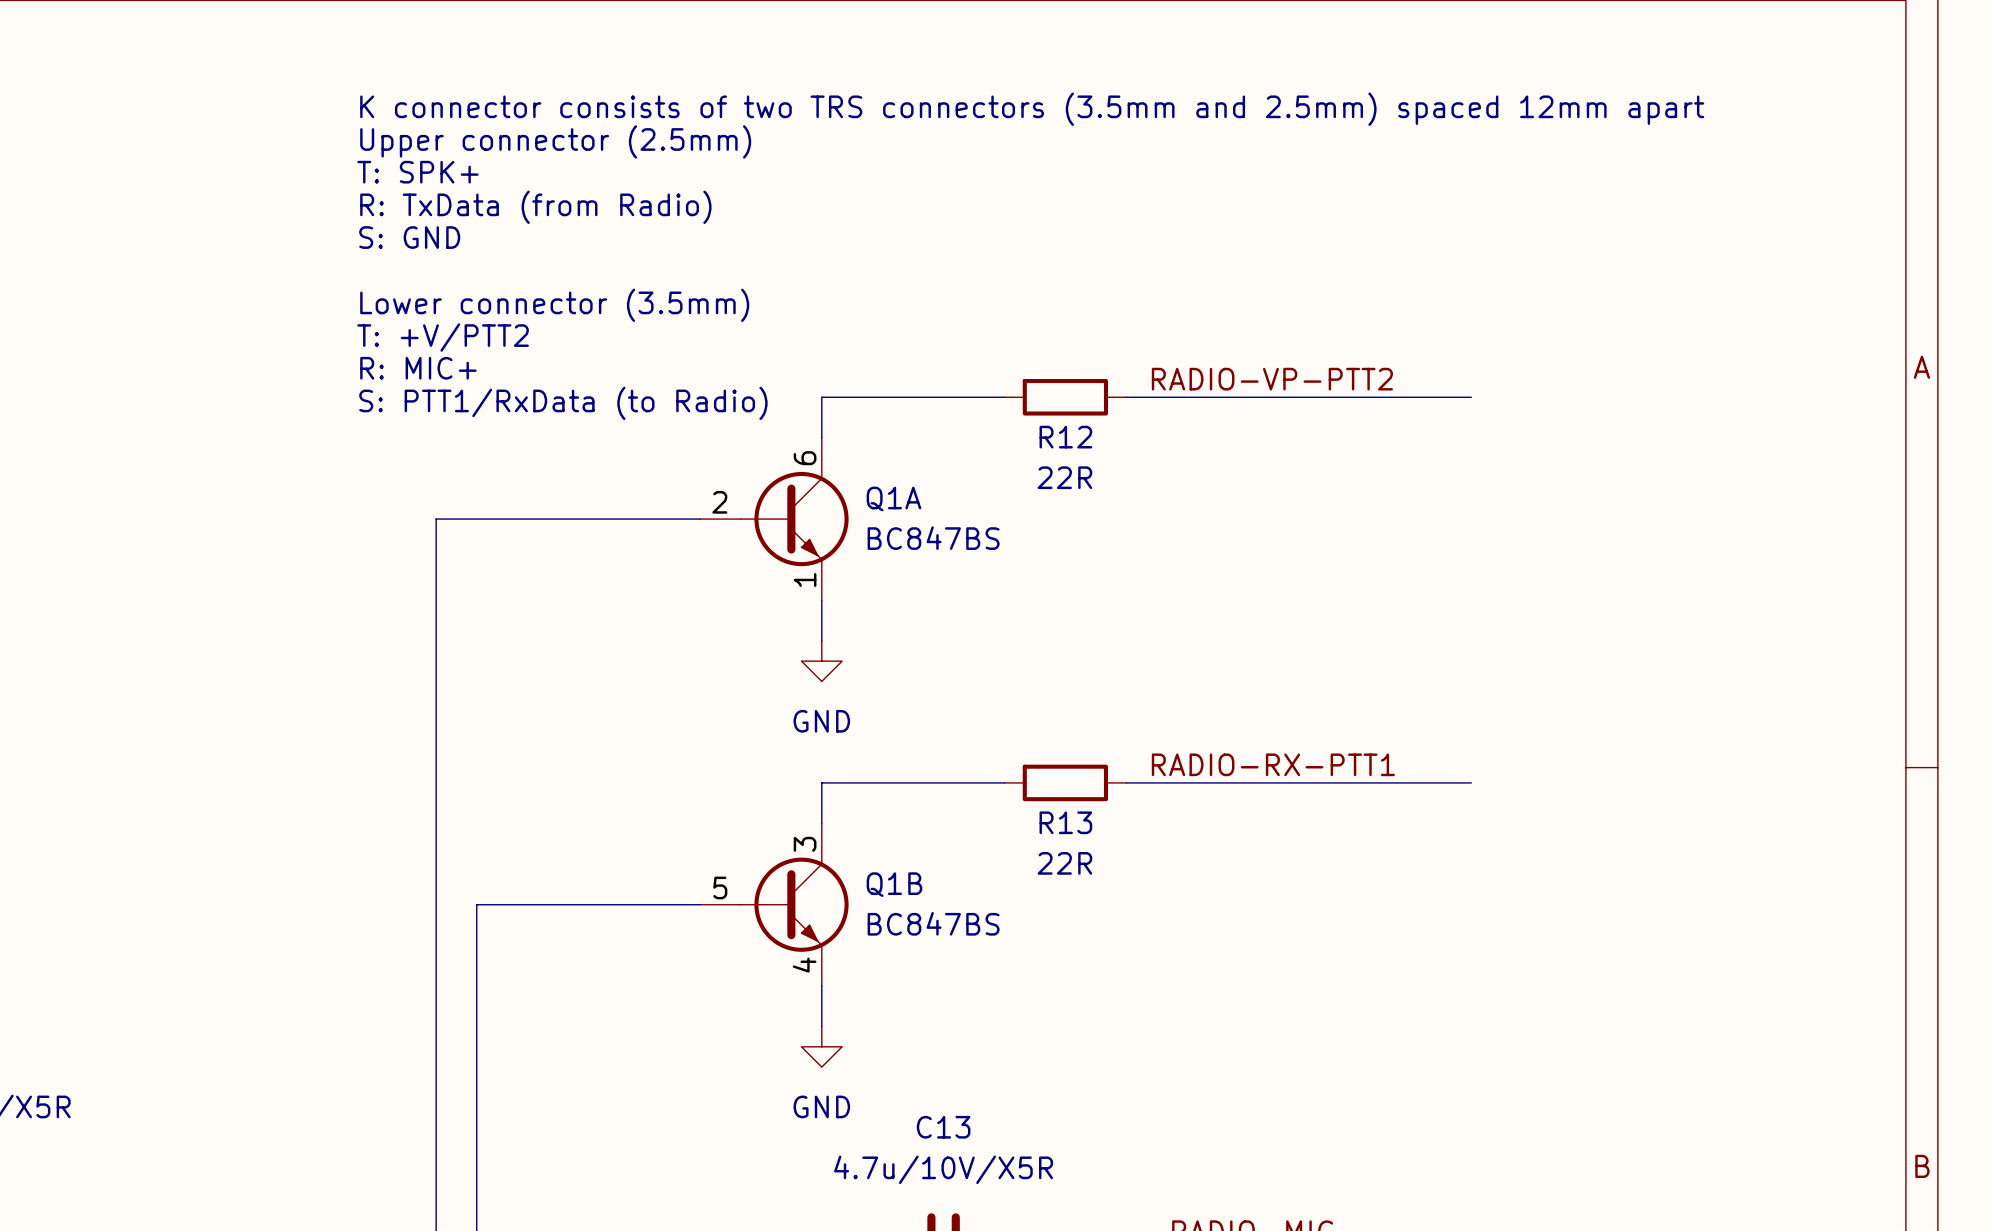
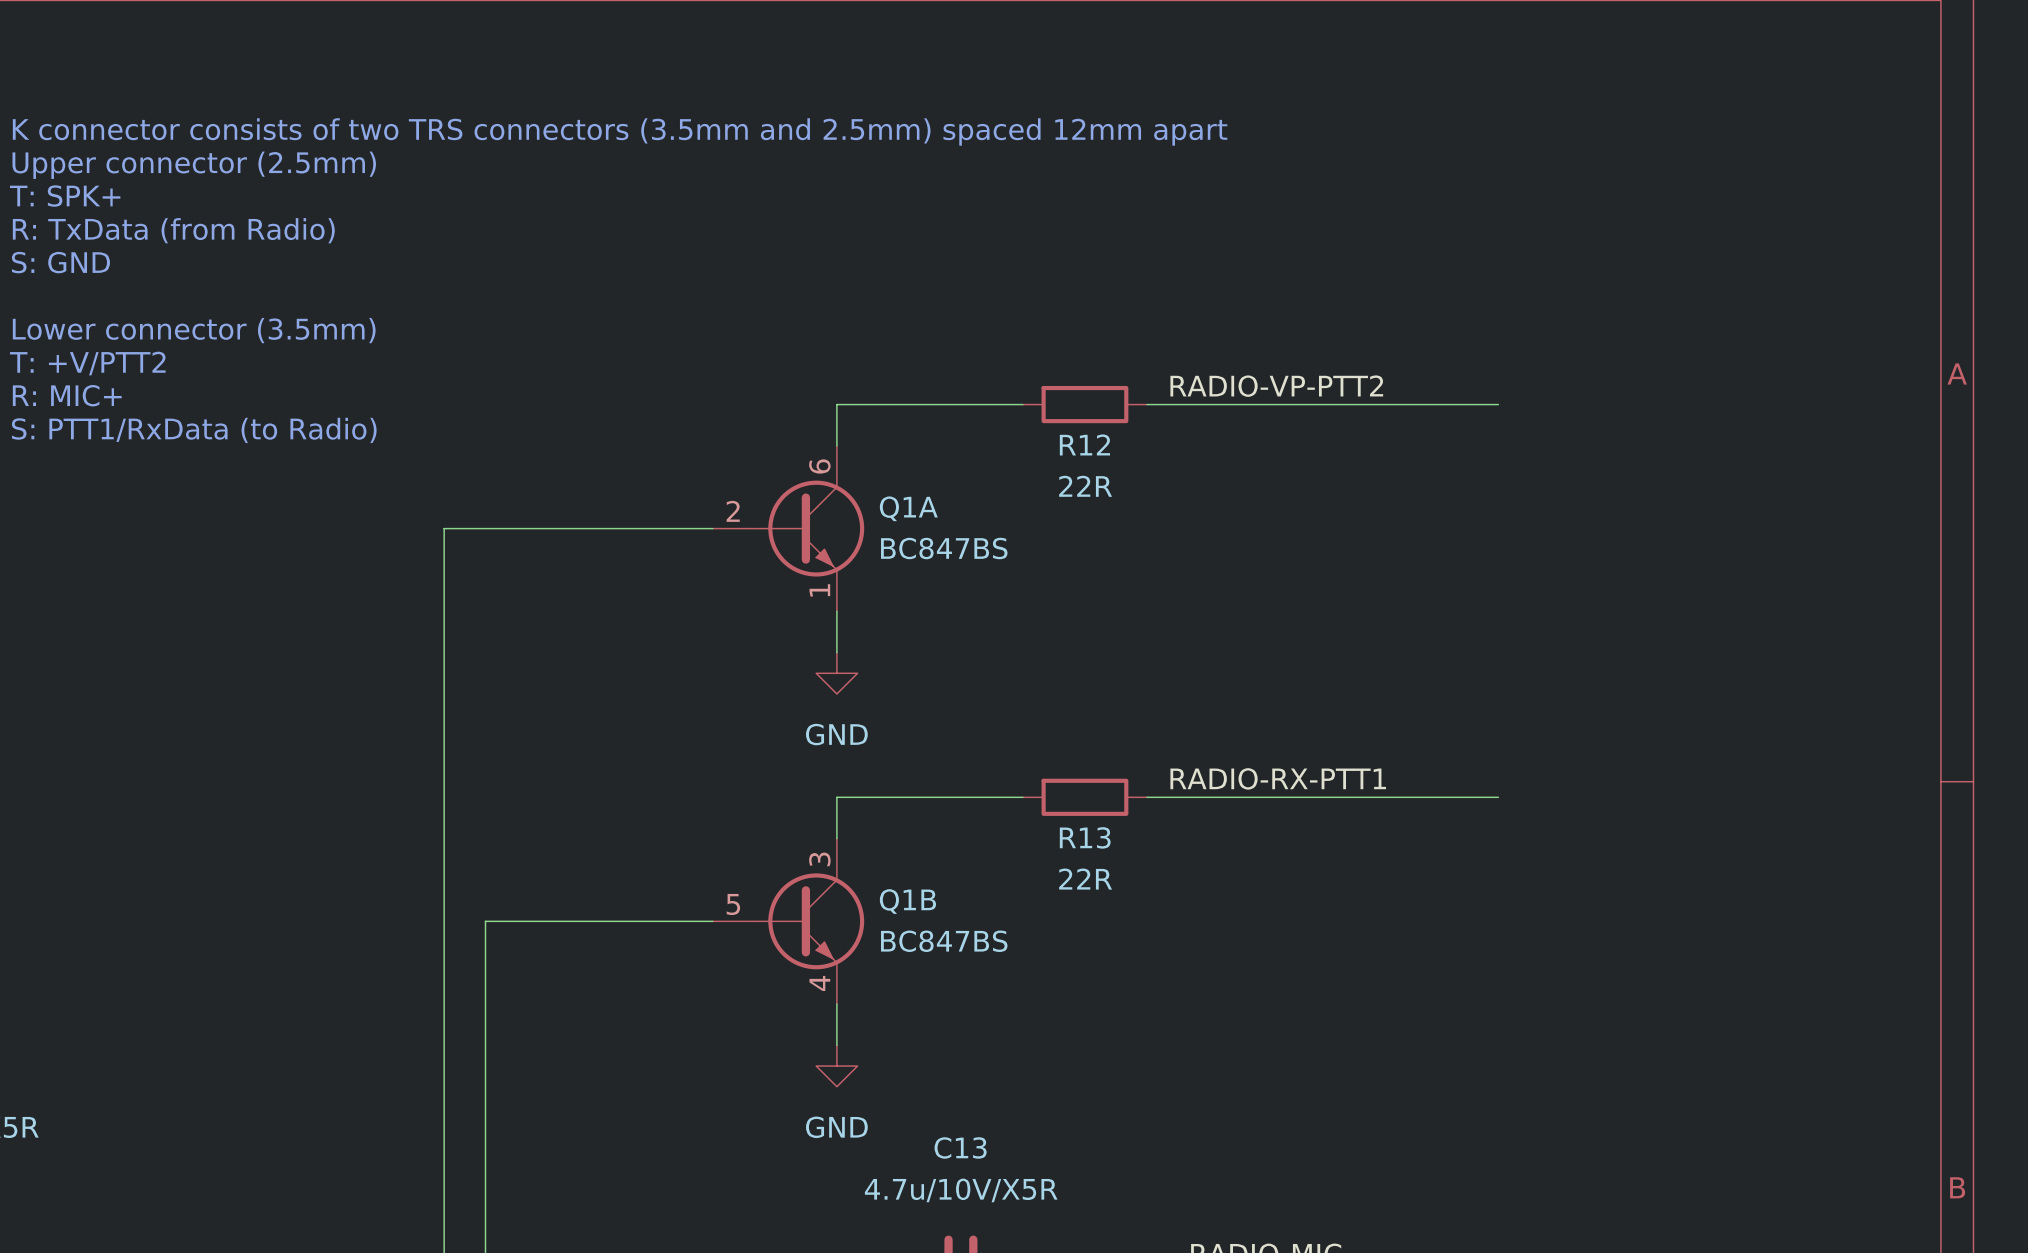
text position: K connector consists of two TRS connectors (3.5mm and 2.5mm) spaced 12mm apart (1032, 109) -> K connector consists of two TRS connectors (3.5mm and 2.5mm) spaced 12mm apart (620, 131)
text position: Upper connector (2.5mm) (555, 141) -> Upper connector (2.5mm) (194, 165)
text position: T: SPK+ (417, 172) -> T: SPK+ (65, 196)
text position: R: TxData (from Radio) (535, 207) -> R: TxData (from Radio) (173, 230)
text position: S: GND (409, 237) -> S: GND (60, 262)
text position: Lower connector (3.5mm) (554, 305) -> Lower connector (3.5mm) (194, 330)
text position: T: +V/PTT2 (443, 337) -> T: +V/PTT2 (87, 363)
text position: R: MIC+ (418, 368) -> R: MIC+ (67, 395)
text position: S: PTT1/RxData (to Radio) (563, 403) -> S: PTT1/RxData (to Radio) (194, 430)

